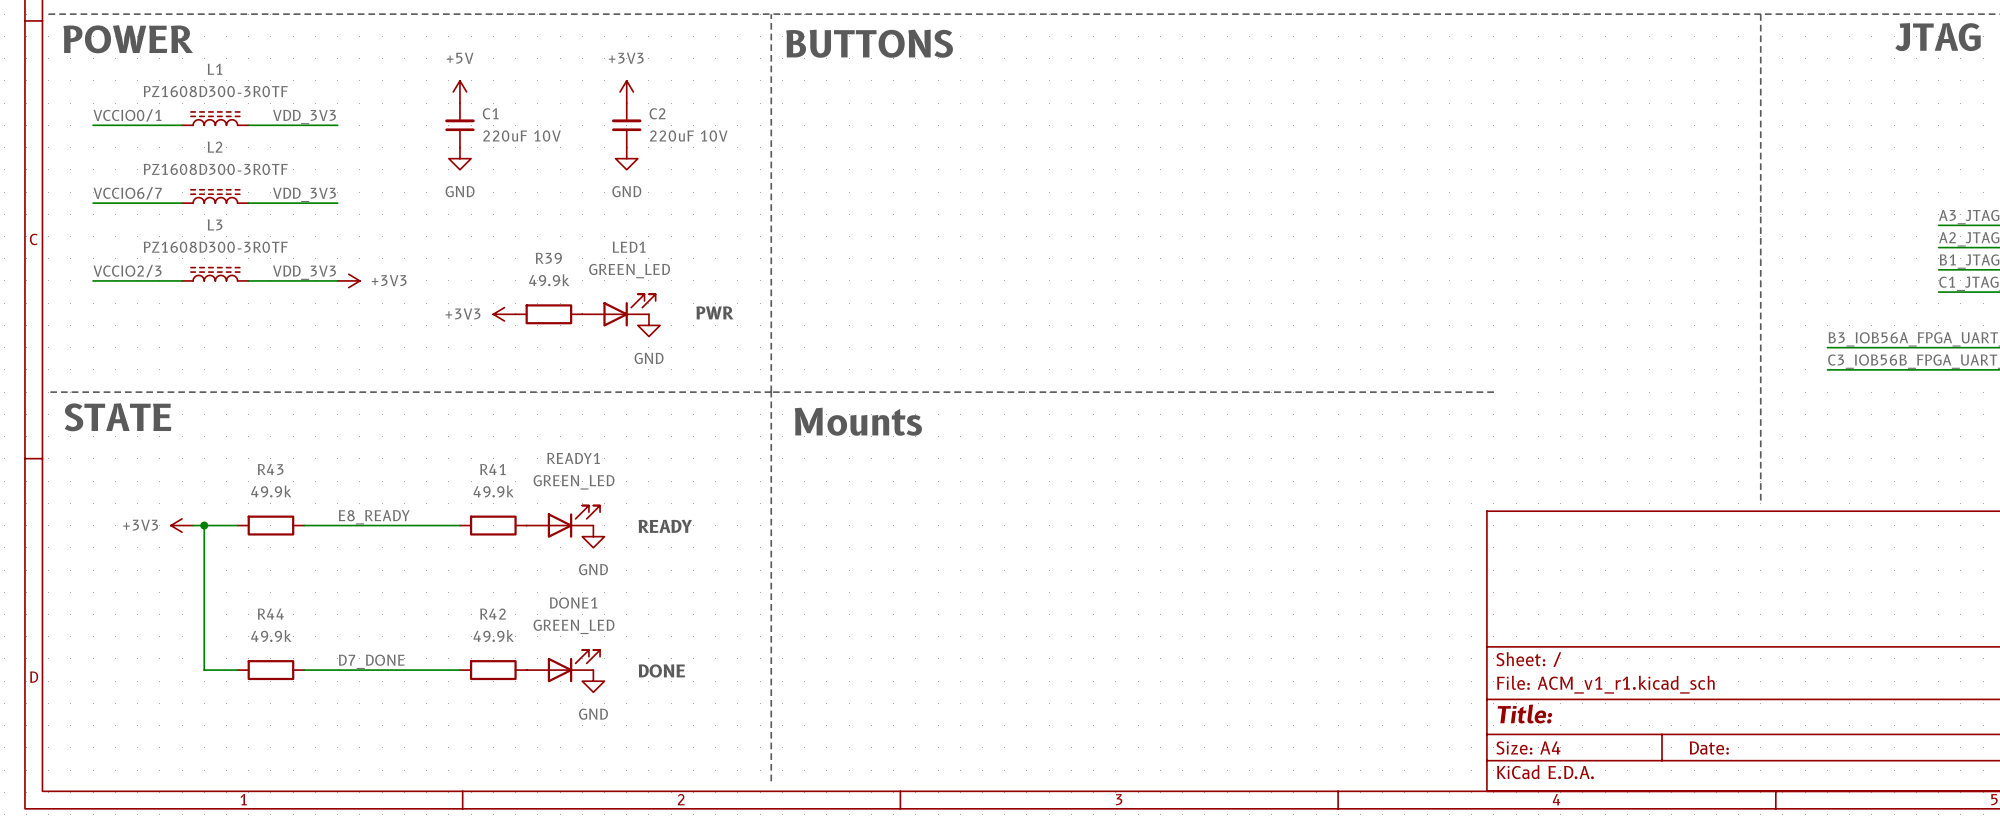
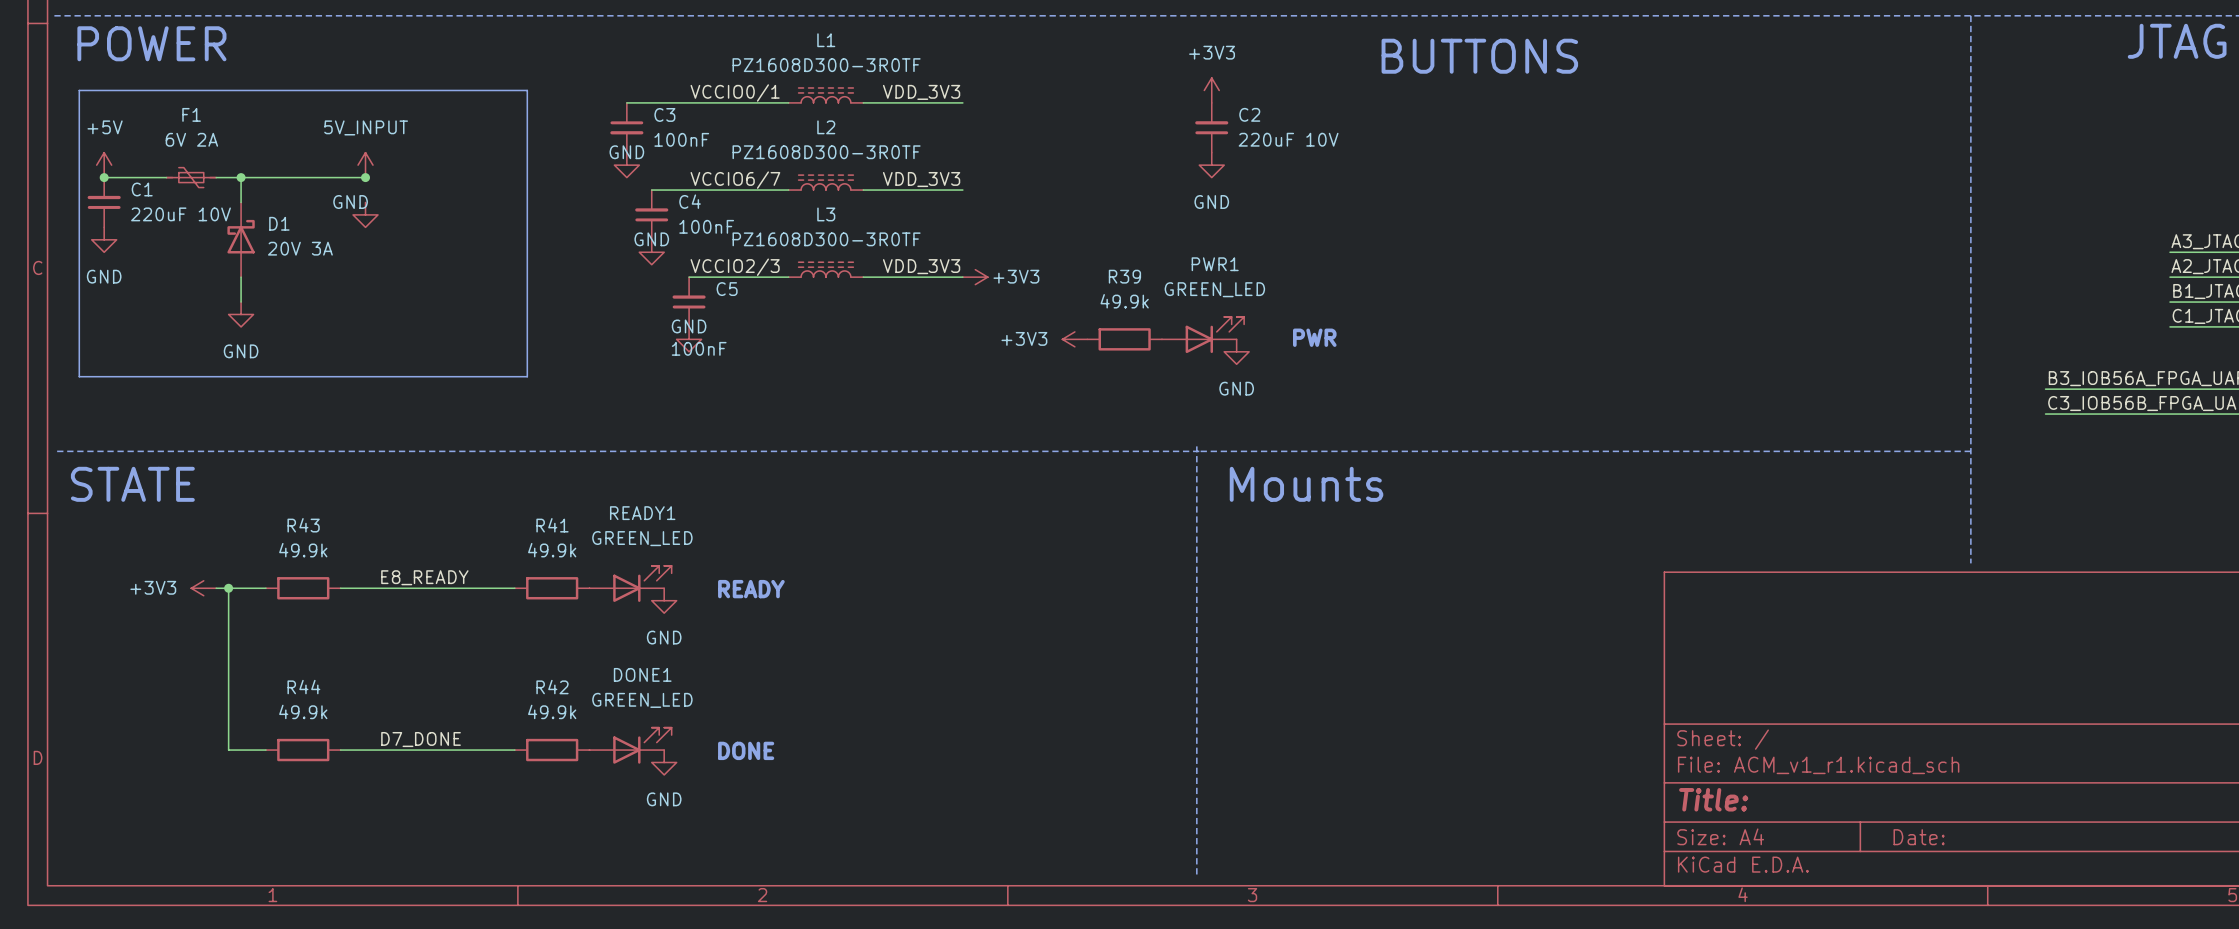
line: (771, 14) (771, 781) -> none
text: BUTTONS (869, 43) -> none
text: none -> BUTTONS (1479, 56)
line: none -> (79, 90) (527, 90) (527, 376) (79, 376) (79, 90)
power symbol: none -> +3V3 (1211, 90)
label: none -> VCCIO0/1 (735, 93)
label: none -> VDD_3V3 (921, 92)
power symbol: +5V (459, 91) -> none
wire: none -> (626, 102) (788, 102)
power symbol: +3V3 (626, 91) -> none
wire: none -> (863, 102) (962, 102)
C3: none -> 100nF (626, 127)
label: VCCIO0/1 (127, 115) -> none
label: VDD_3V3 (304, 117) -> none
L1 position: (215, 118) -> (825, 95)
wire: (93, 125) (182, 125) -> none
wire: (248, 125) (337, 125) -> none
C1 position: (459, 125) -> (104, 202)
C2 position: (626, 125) -> (1211, 127)
power symbol: none -> +5V (104, 165)
power symbol: none -> 5V_INPUT (365, 165)
power symbol: none -> GND (626, 165)
power symbol: none -> GND (1211, 165)
wire: none -> (104, 177) (166, 177)
junction: none -> (104, 177)
F1: none -> 6V 2A (191, 177)
wire: none -> (216, 177) (365, 177)
wire: none -> (241, 177) (241, 202)
junction: none -> (241, 177)
junction: none -> (365, 177)
power symbol: GND (459, 158) -> none
power symbol: GND (626, 158) -> none
label: none -> VCCIO6/7 (735, 180)
label: none -> VDD_3V3 (921, 179)
wire: none -> (651, 190) (788, 190)
wire: none -> (863, 190) (962, 190)
power symbol: none -> GND (365, 214)
C4: none -> 100nF (651, 214)
label: VCCIO6/7 (127, 193) -> none
label: VDD_3V3 (304, 194) -> none
L2 position: (215, 196) -> (825, 182)
wire: (93, 203) (182, 203) -> none
wire: (248, 203) (337, 203) -> none
power symbol: none -> GND (104, 239)
D1: none -> 20V 3A (241, 239)
power symbol: none -> GND (651, 252)
label: none -> VCCIO2/3 (735, 267)
label: none -> VDD_3V3 (921, 266)
wire: none -> (241, 277) (241, 302)
wire: none -> (689, 277) (788, 277)
wire: none -> (863, 277) (962, 277)
power symbol: none -> +3V3 (975, 277)
C5: none -> 100nF (689, 302)
label: VCCIO2/3 (127, 271) -> none
label: VDD_3V3 (304, 272) -> none
L3 position: (215, 274) -> (825, 269)
wire: (93, 280) (182, 280) -> none
power symbol: none -> GND (241, 314)
wire: (248, 280) (337, 280) -> none
power symbol: +3V3 (348, 280) -> none
PWR1: none -> GREEN_LED (1203, 335)
text: none -> PWR (1314, 337)
power symbol: none -> +3V3 (1074, 339)
LED1: GREEN_LED (618, 310) -> none
text: PWR (714, 312) -> none
power symbol: +3V3 (504, 314) -> none
R39 position: (548, 314) -> (1124, 339)
power symbol: none -> GND (1236, 351)
power symbol position: GND (648, 325) -> GND (689, 339)
power symbol text position: GND (649, 358) -> GND (689, 326)
line: (48, 392) (1493, 392) -> none
line: none -> (1196, 446) (1196, 874)
line: none -> (54, 451) (1970, 451)
text position: STATE (118, 417) -> STATE (132, 484)
text: Mounts (858, 421) -> none
text: none -> Mounts (1306, 484)

